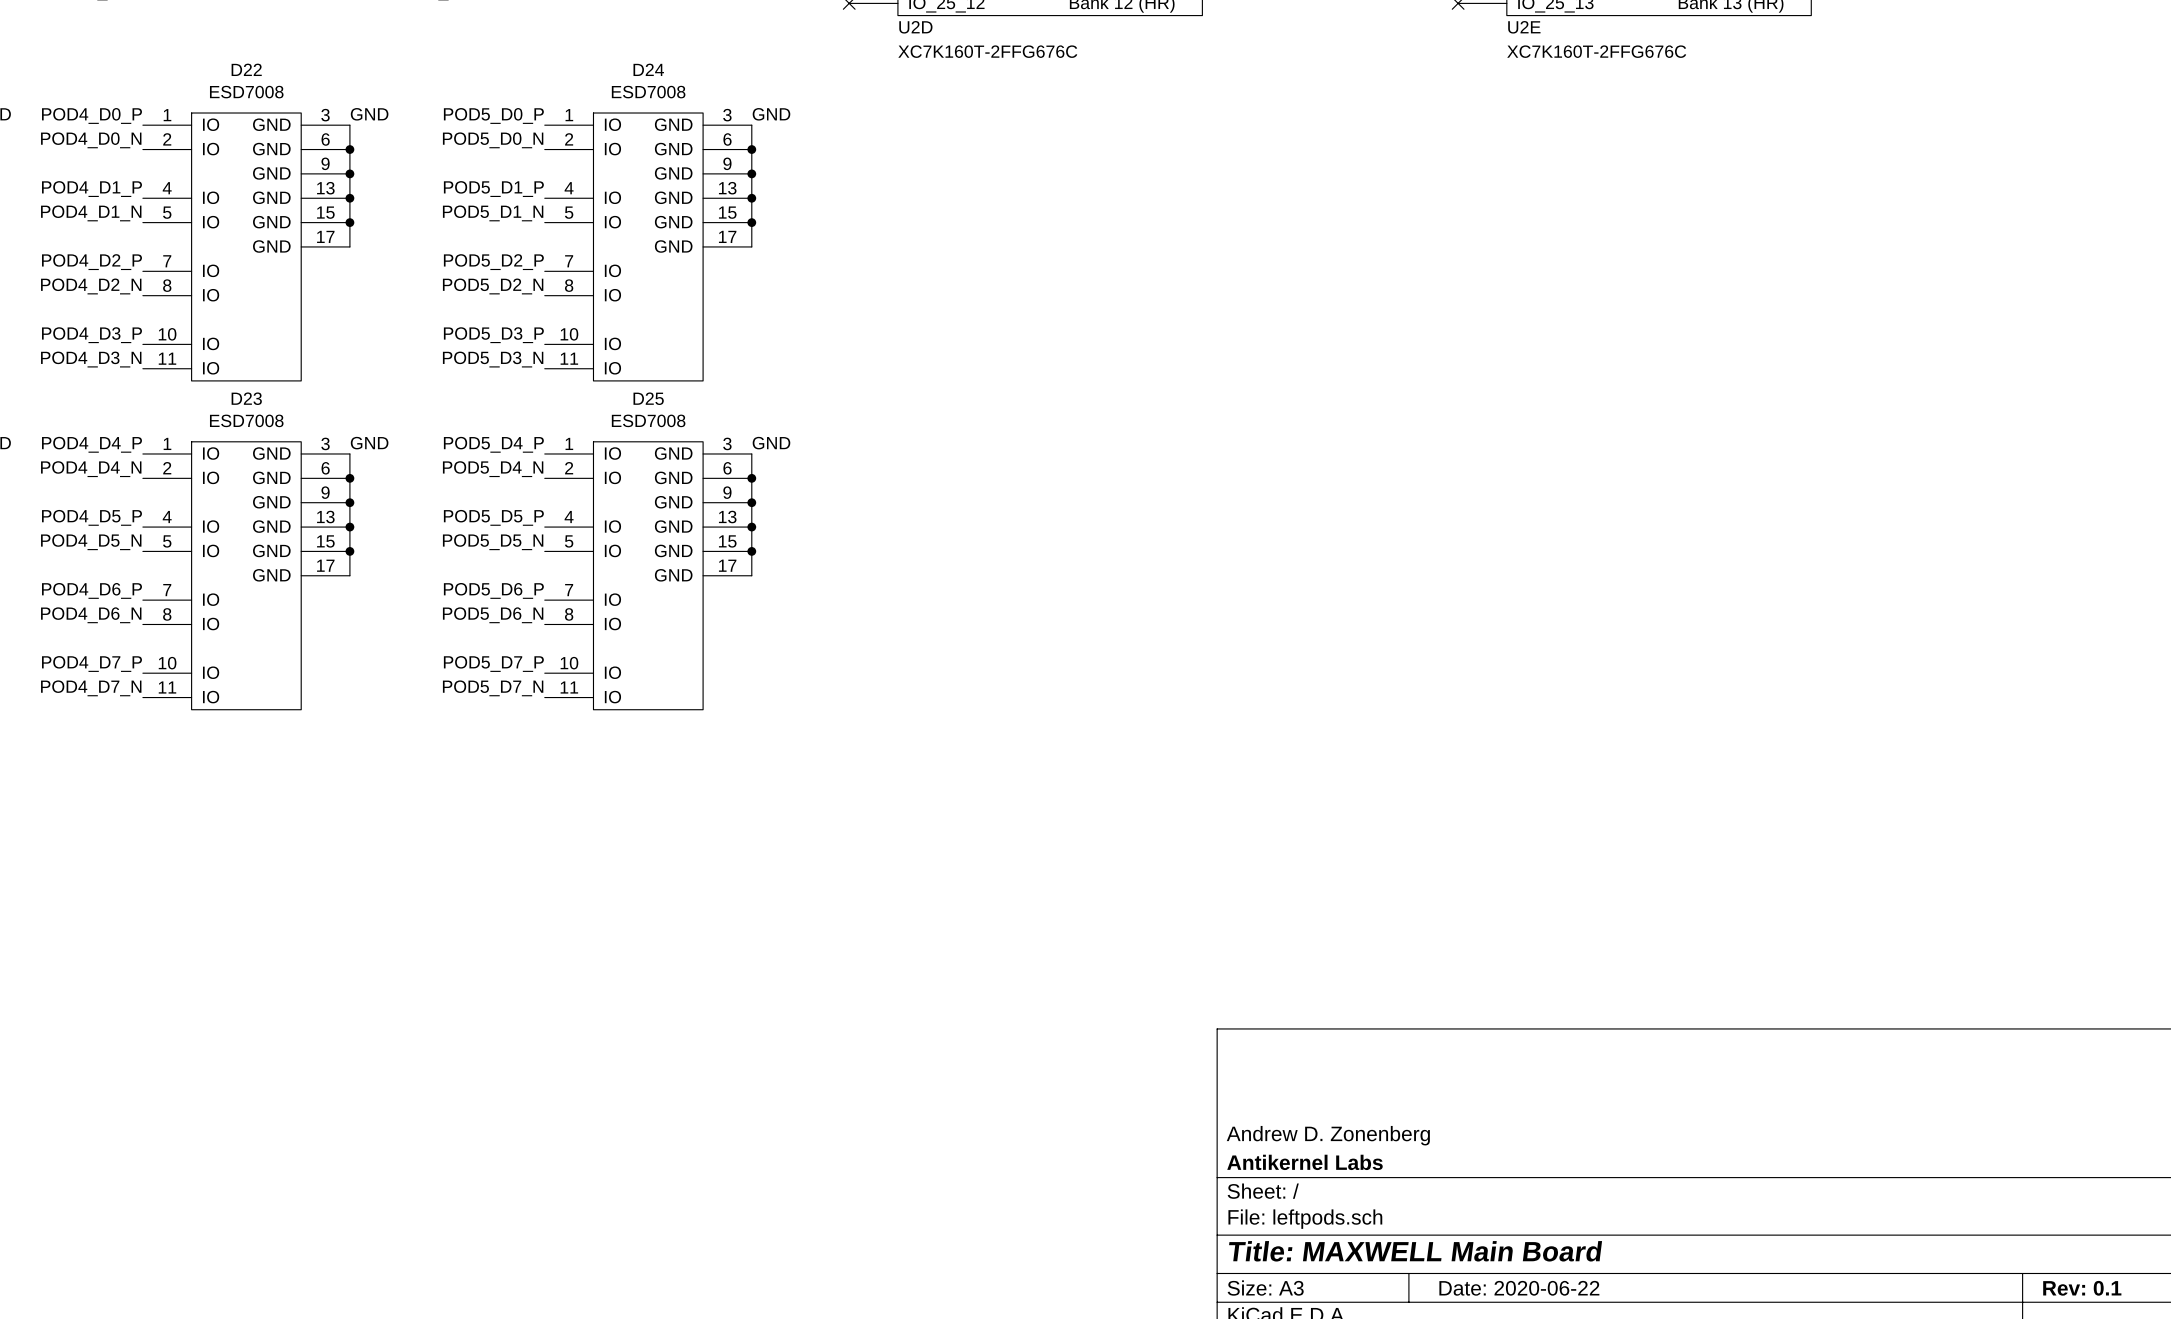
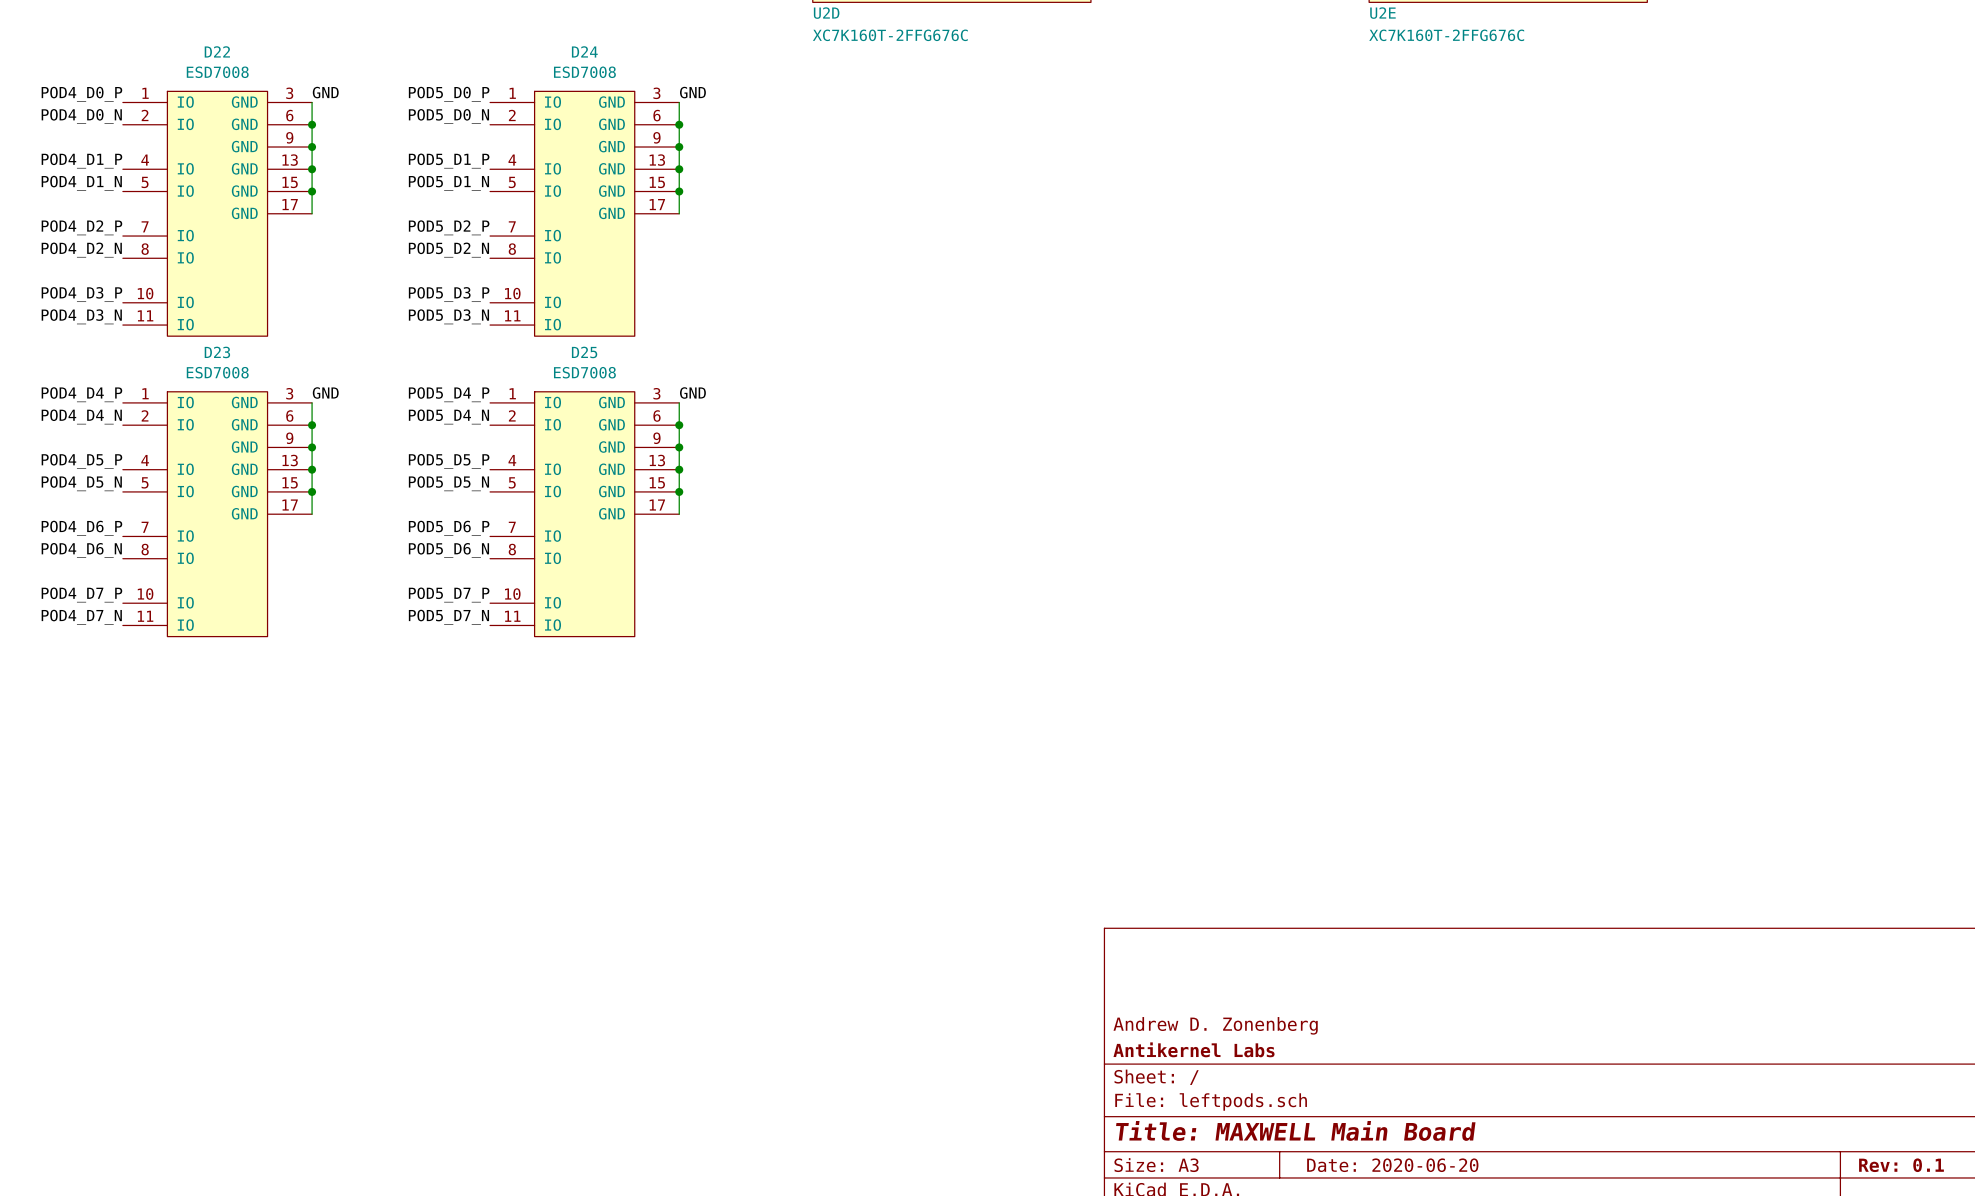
title block: Date: 2020-06-22 (1519, 1288) -> Date: 2020-06-20 (1392, 1165)

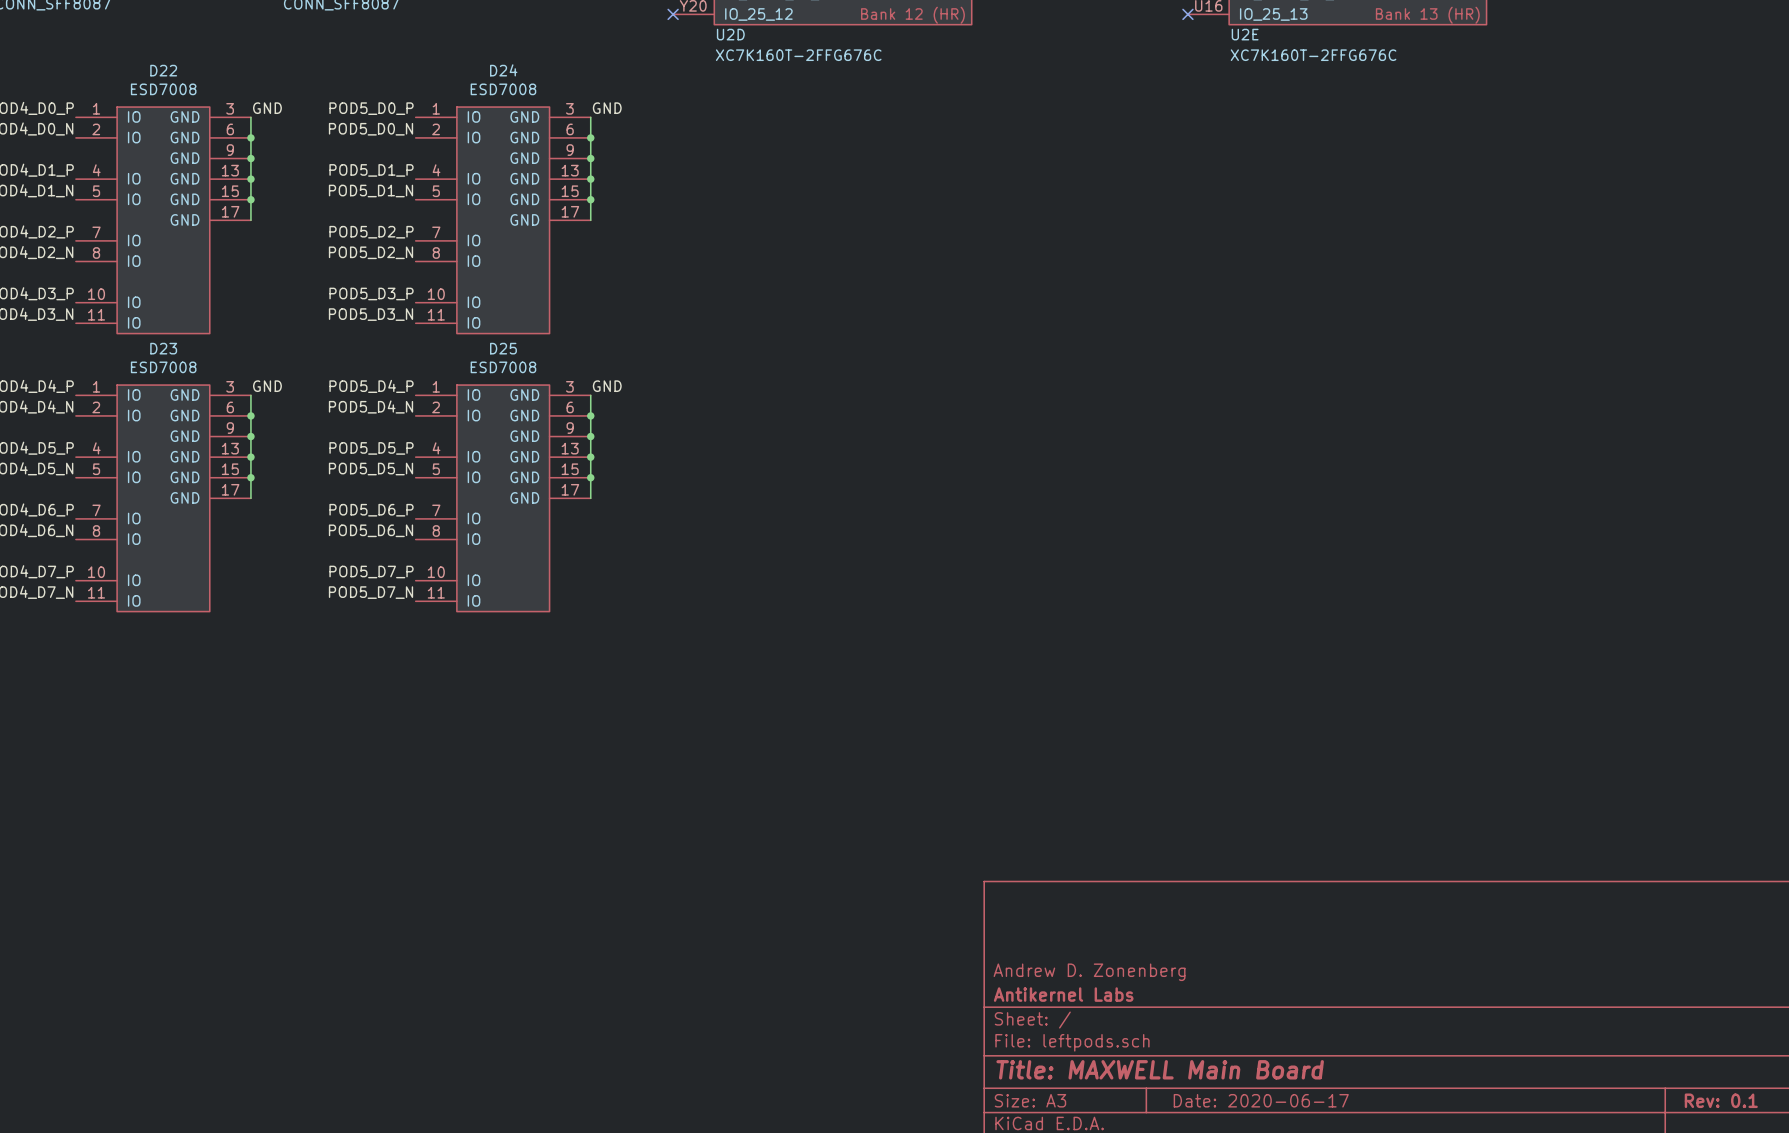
title block: Date: 2020-06-20 (1392, 1165) -> Date: 2020-06-17 (1261, 1100)

